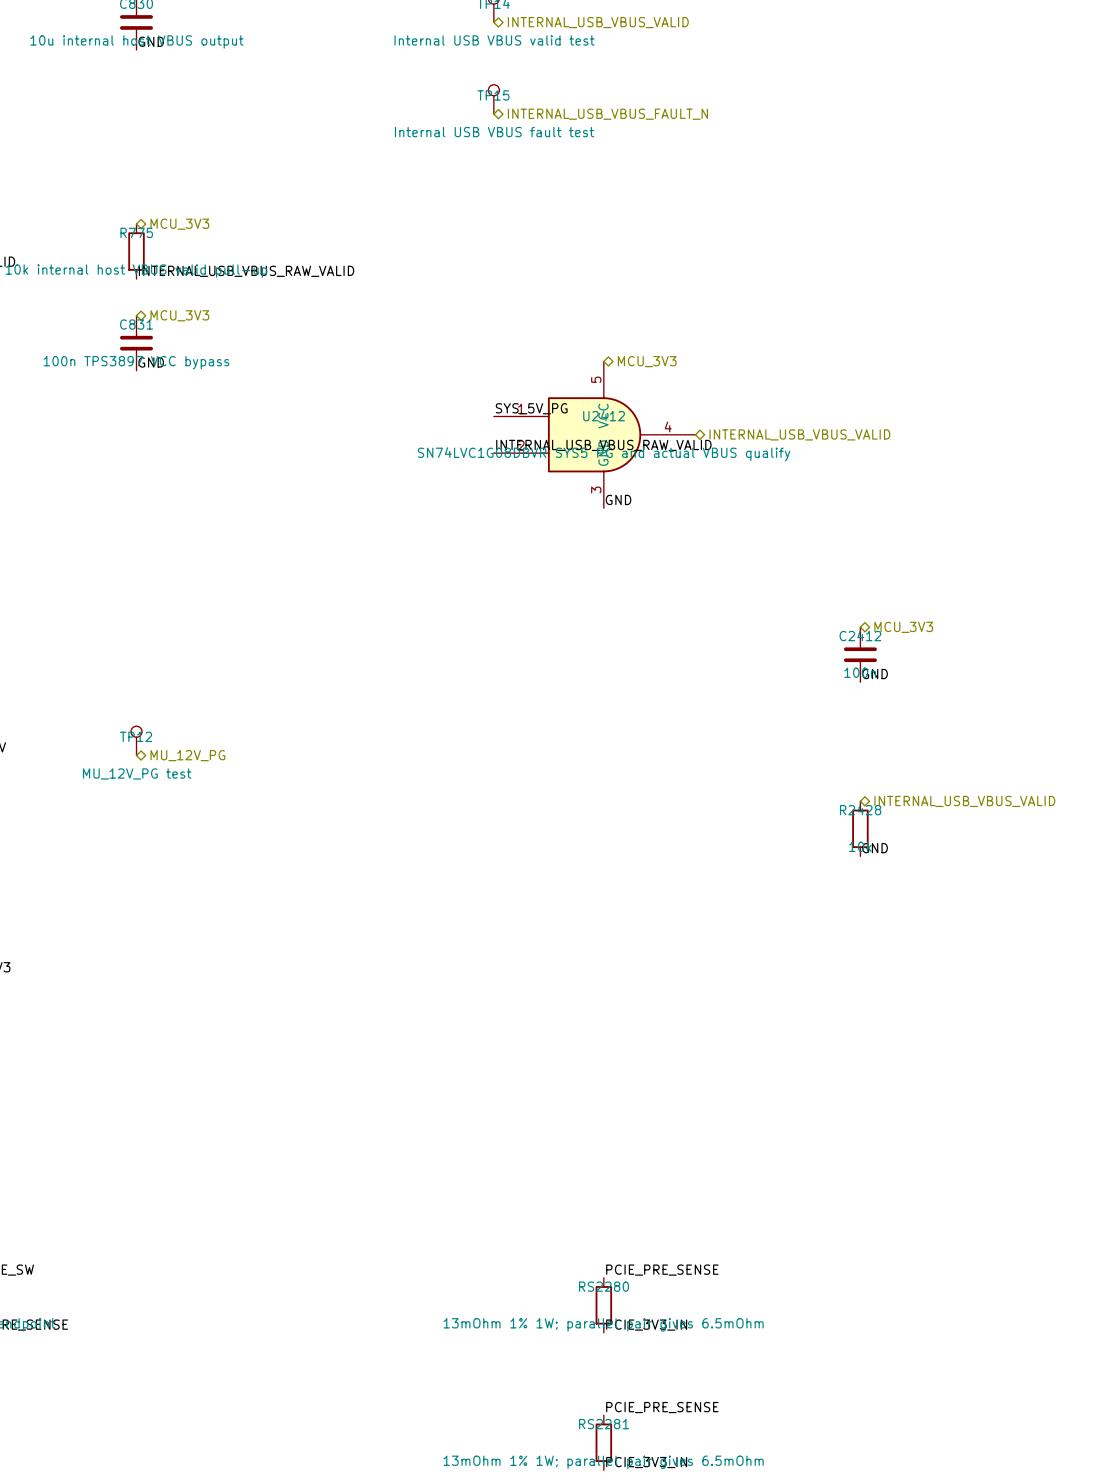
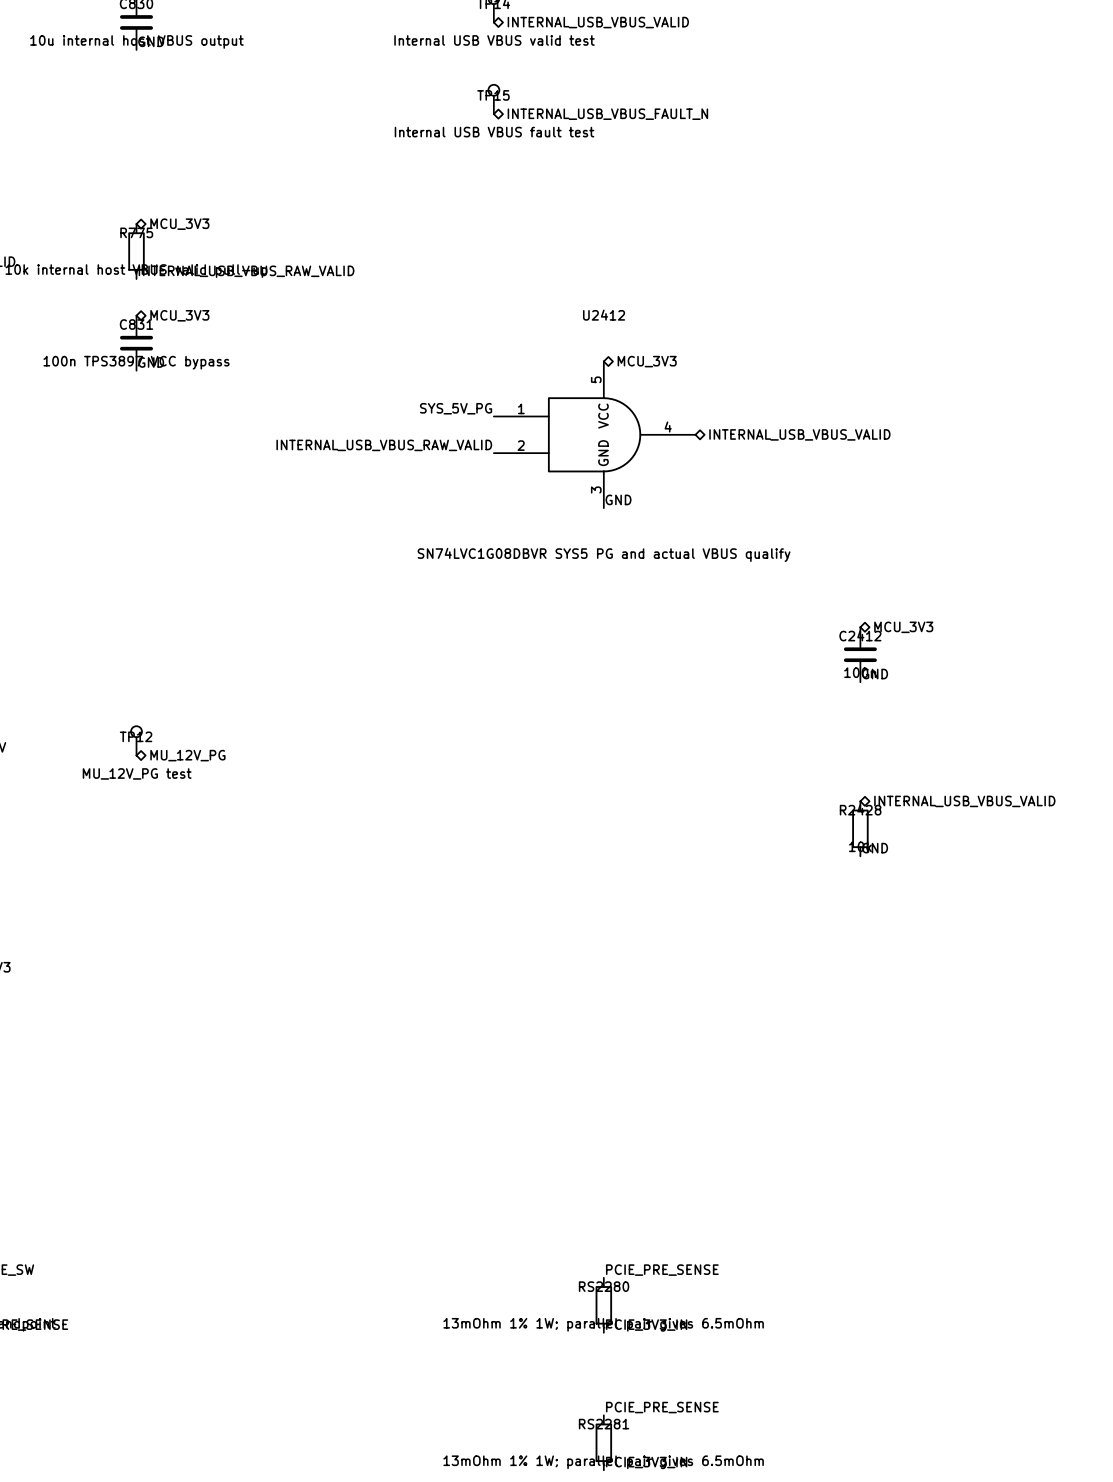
label position: SYS_5V_PG (531, 408) -> SYS_5V_PG (456, 408)
U2412 name position: U2412 (604, 415) -> U2412 (604, 315)
label position: INTERNAL_USB_VBUS_RAW_VALID (603, 445) -> INTERNAL_USB_VBUS_RAW_VALID (384, 445)
U2412 value position: SN74LVC1G08DBVR SYS5 PG and actual VBUS qualify (604, 454) -> SN74LVC1G08DBVR SYS5 PG and actual VBUS qualify (604, 554)

